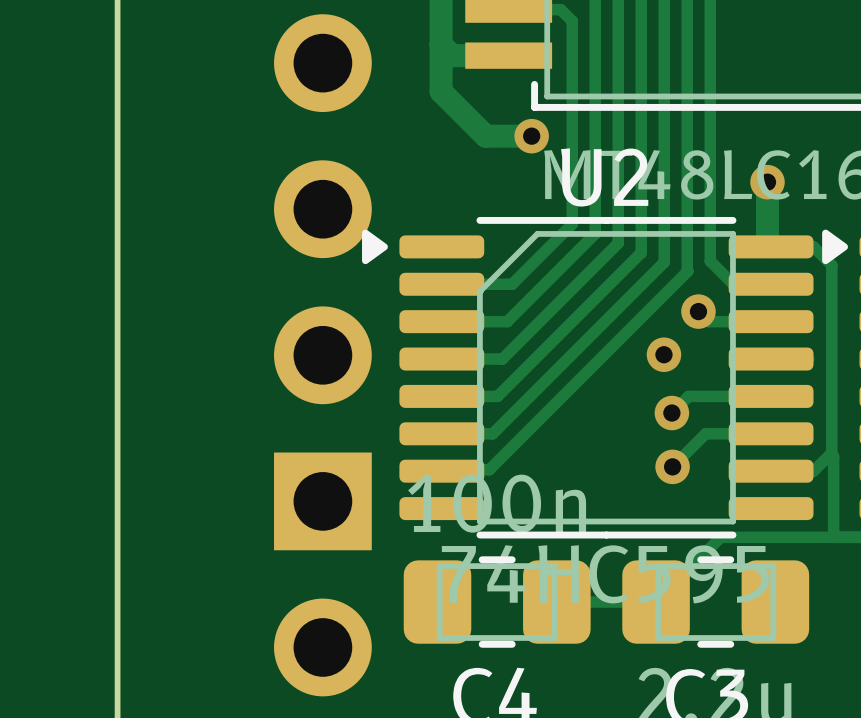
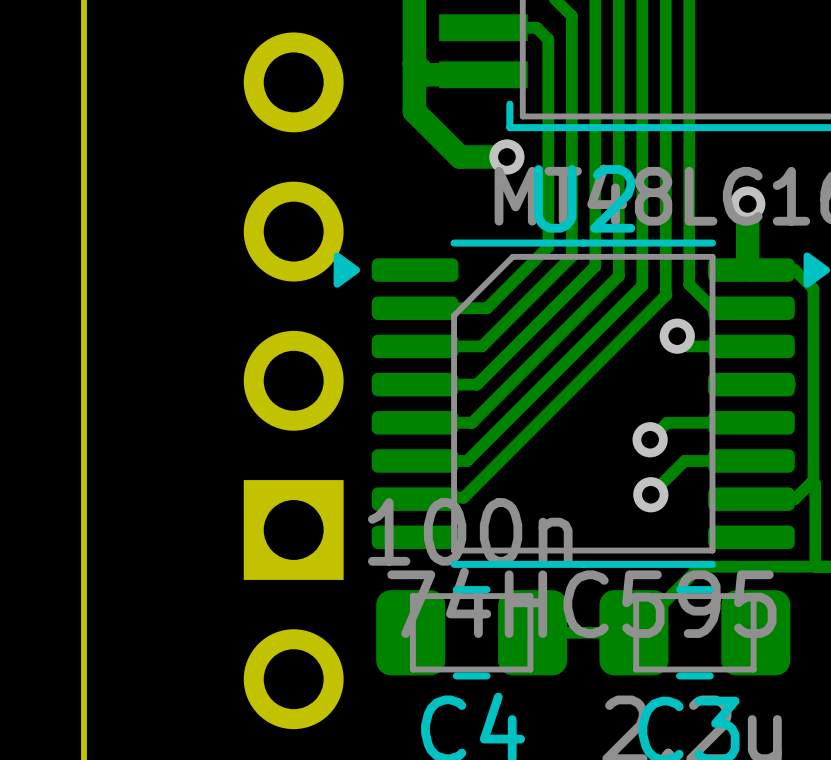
via: (663, 354) -> none

